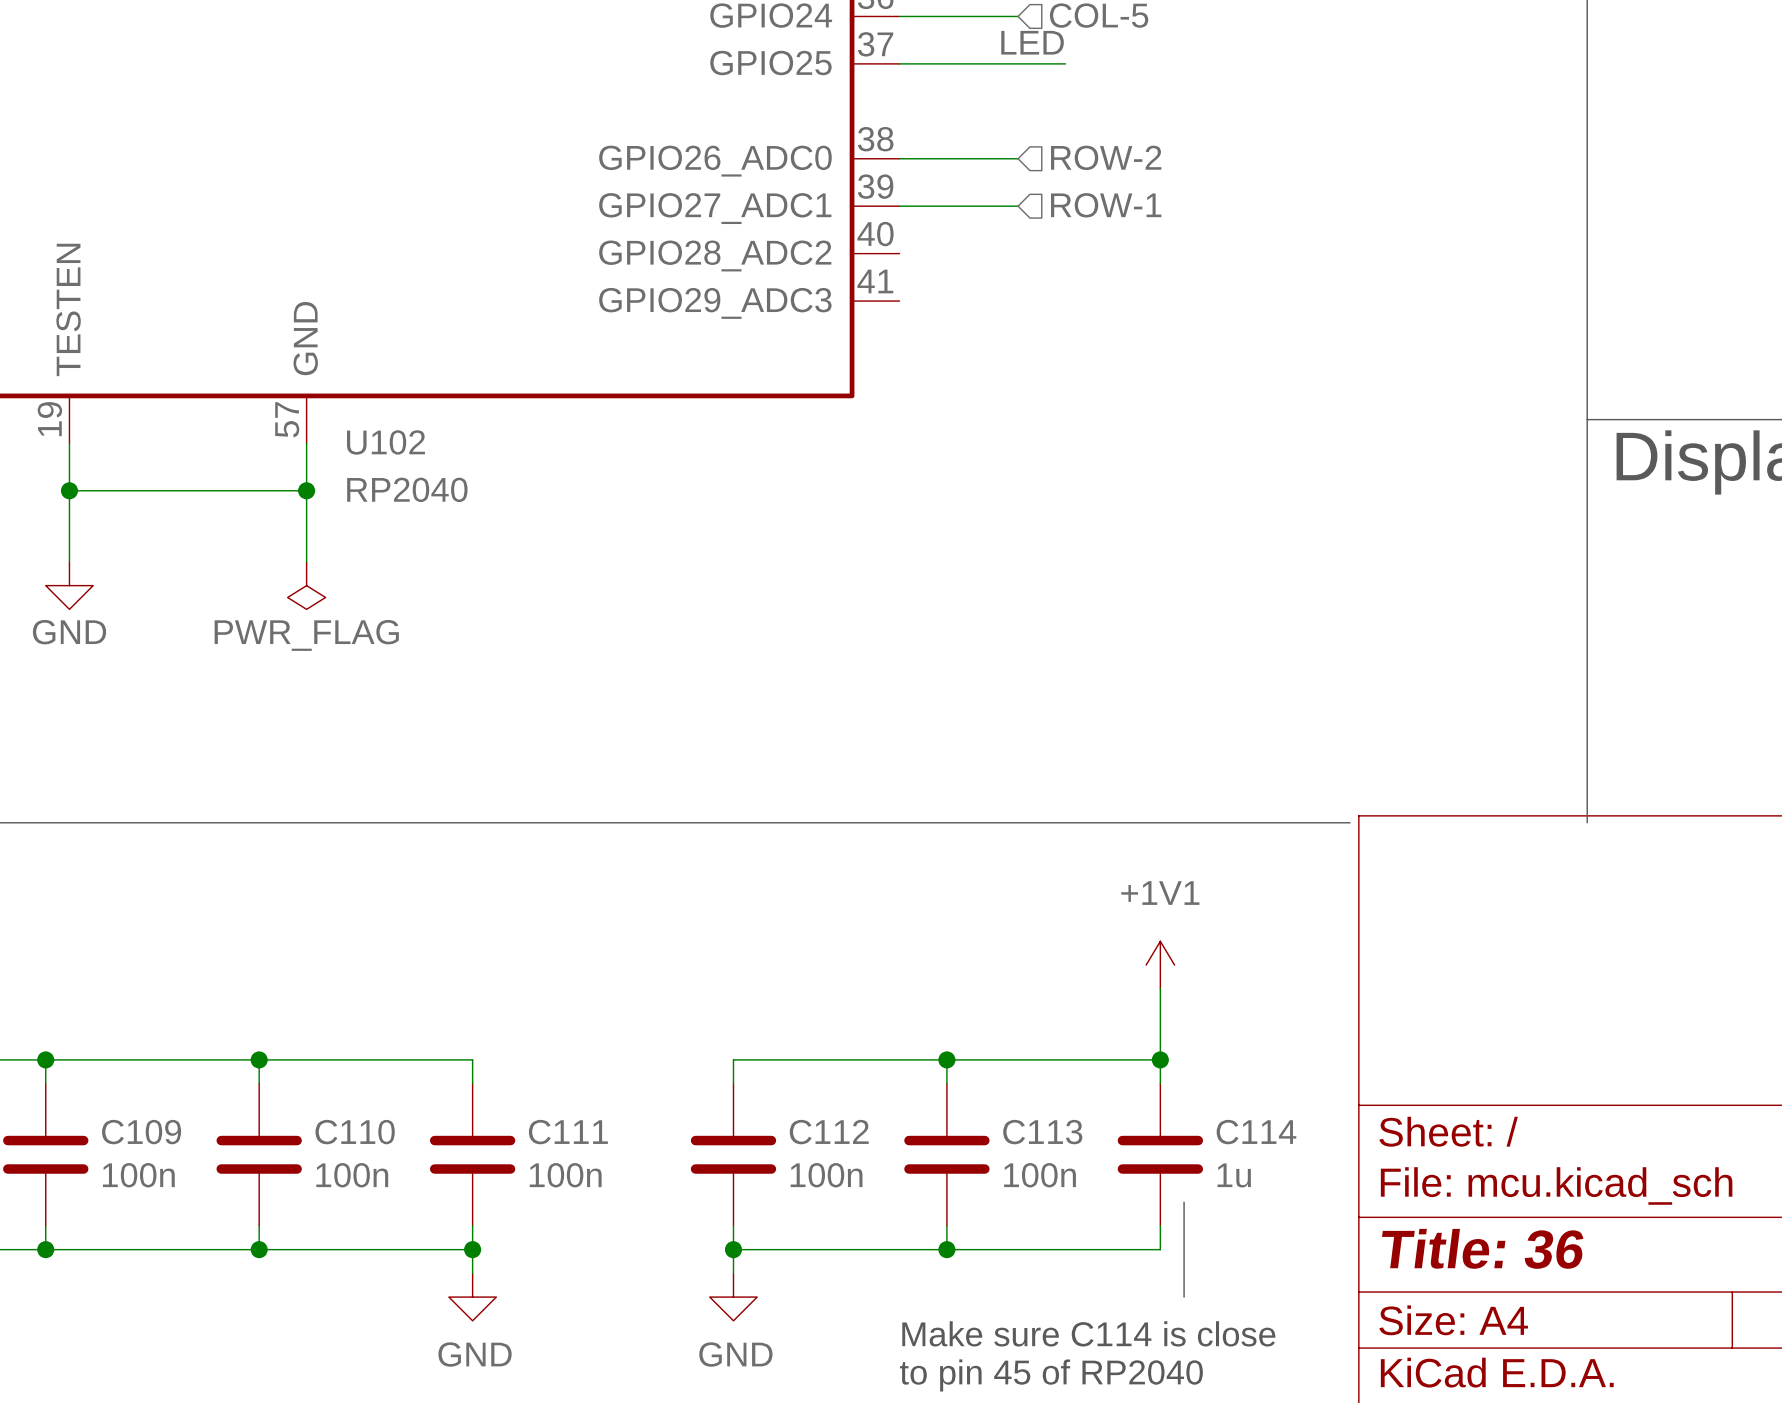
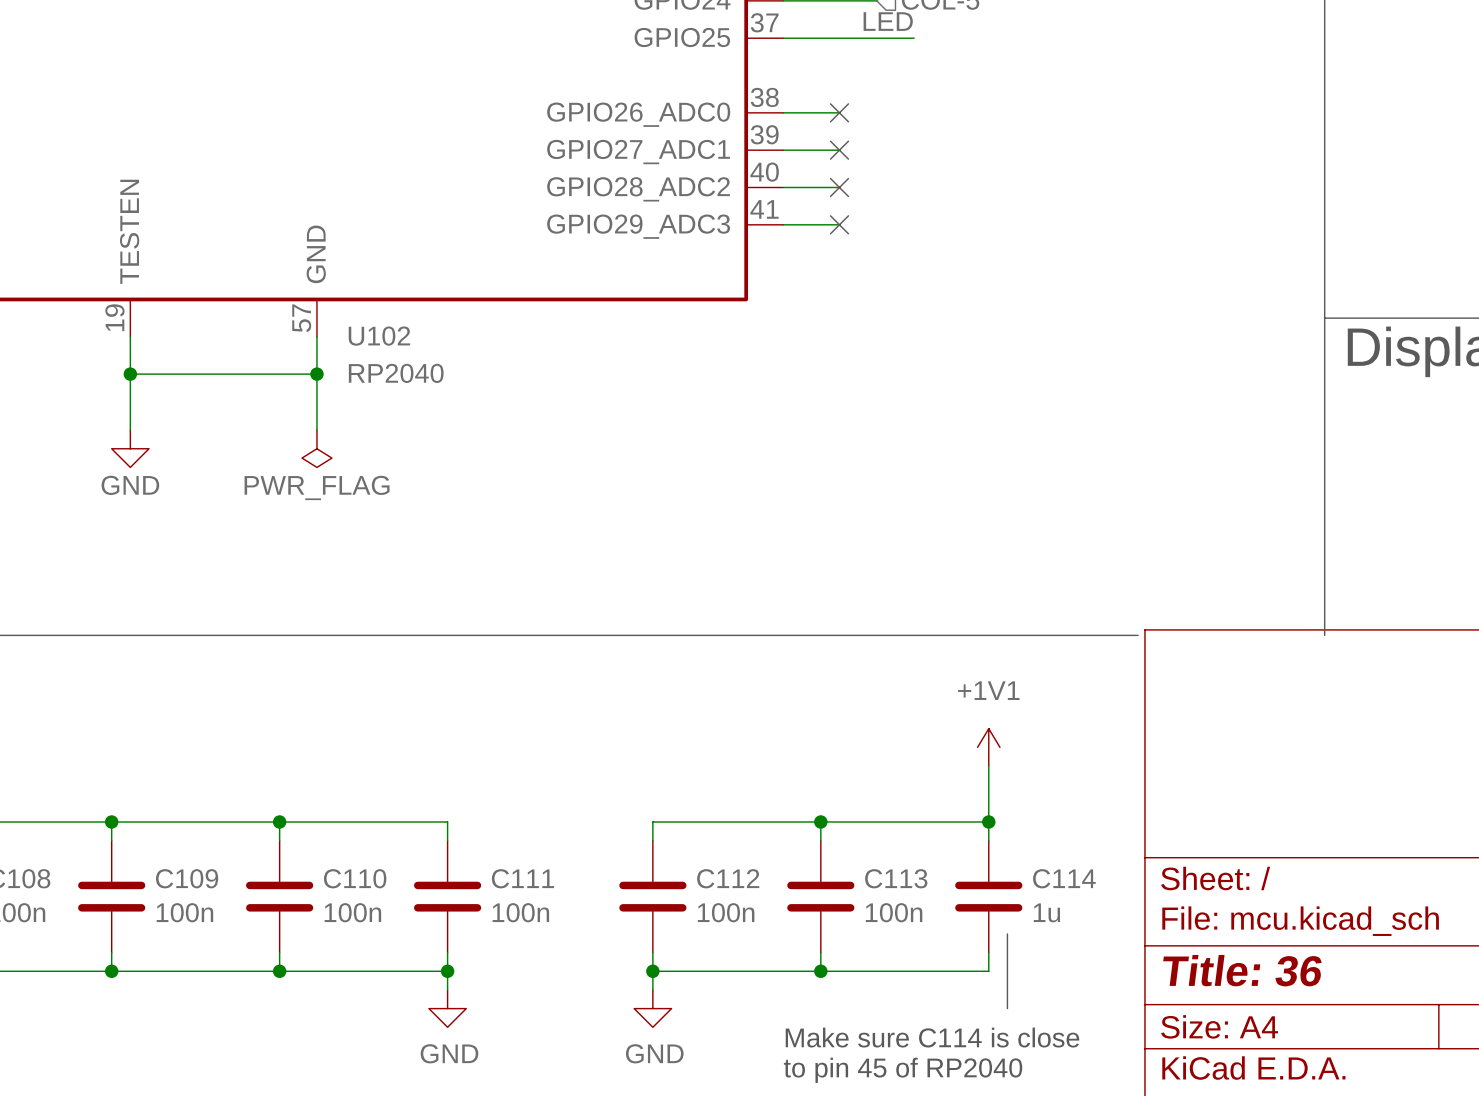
hierarchical label: ROW-2 (1106, 157) -> none
wire: (970, 158) (1018, 158) -> none
no-connect mark: none -> (839, 112)
hierarchical label: ROW-1 (1106, 205) -> none
wire: (970, 206) (1018, 206) -> none
no-connect mark: none -> (839, 150)
wire: none -> (783, 187) (839, 187)
no-connect mark: none -> (839, 187)
wire: none -> (783, 224) (839, 224)
no-connect mark: none -> (839, 224)

